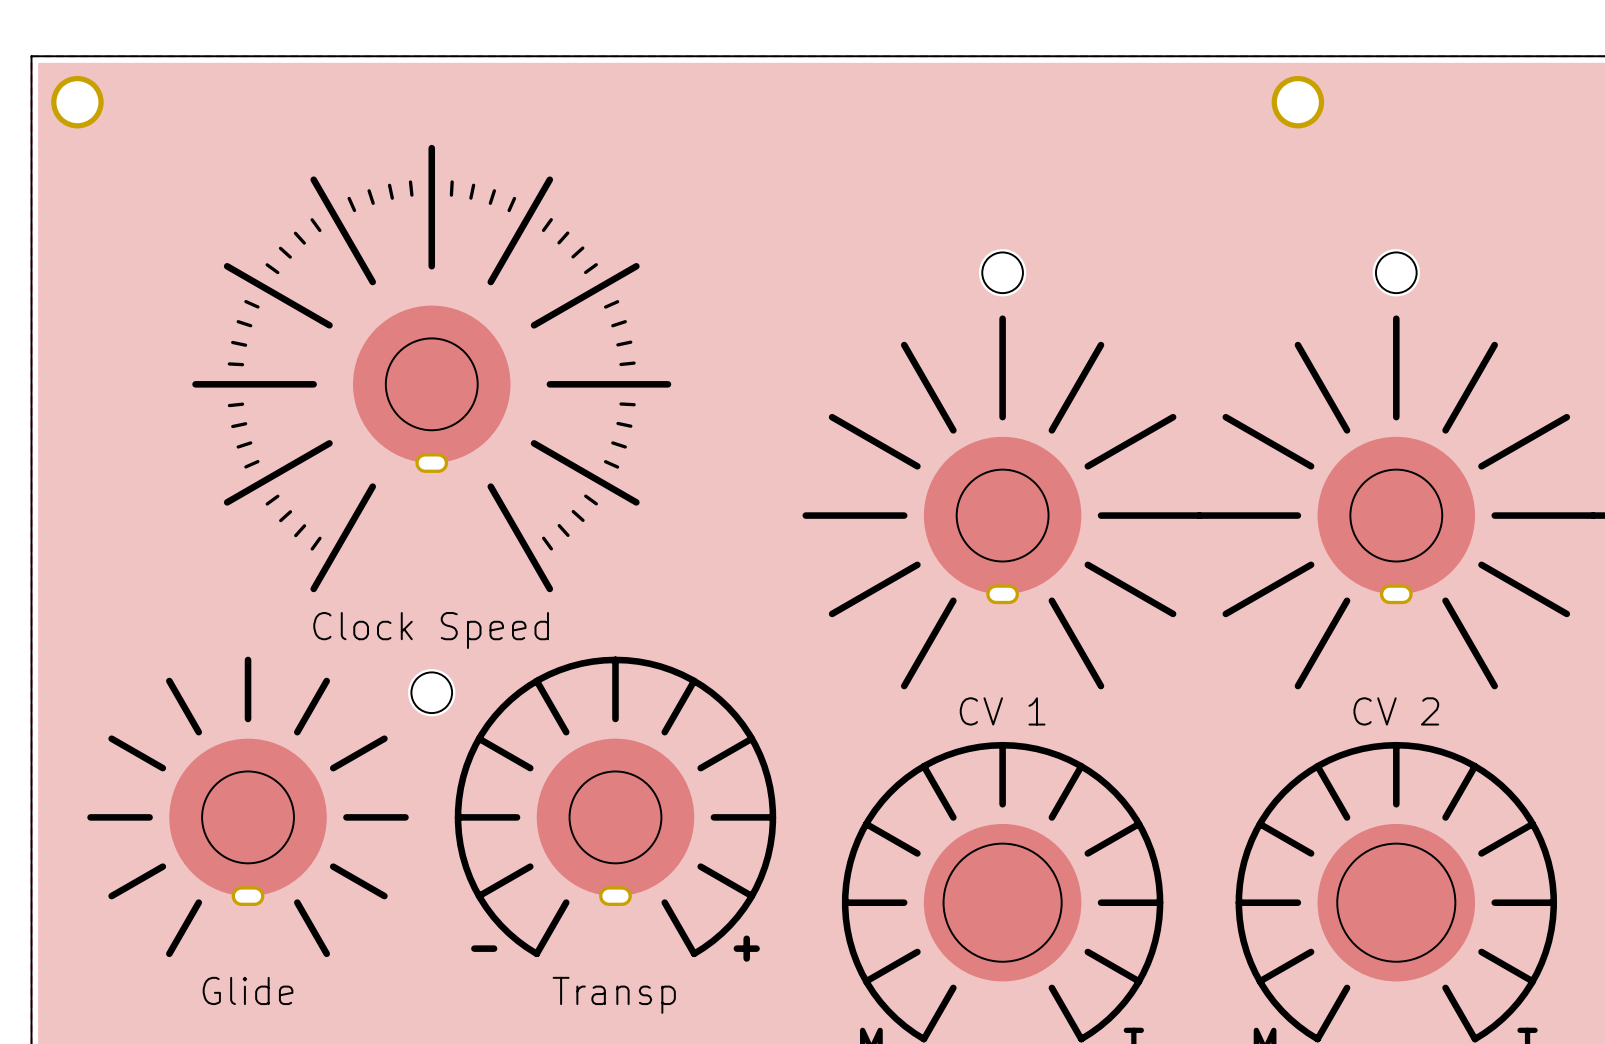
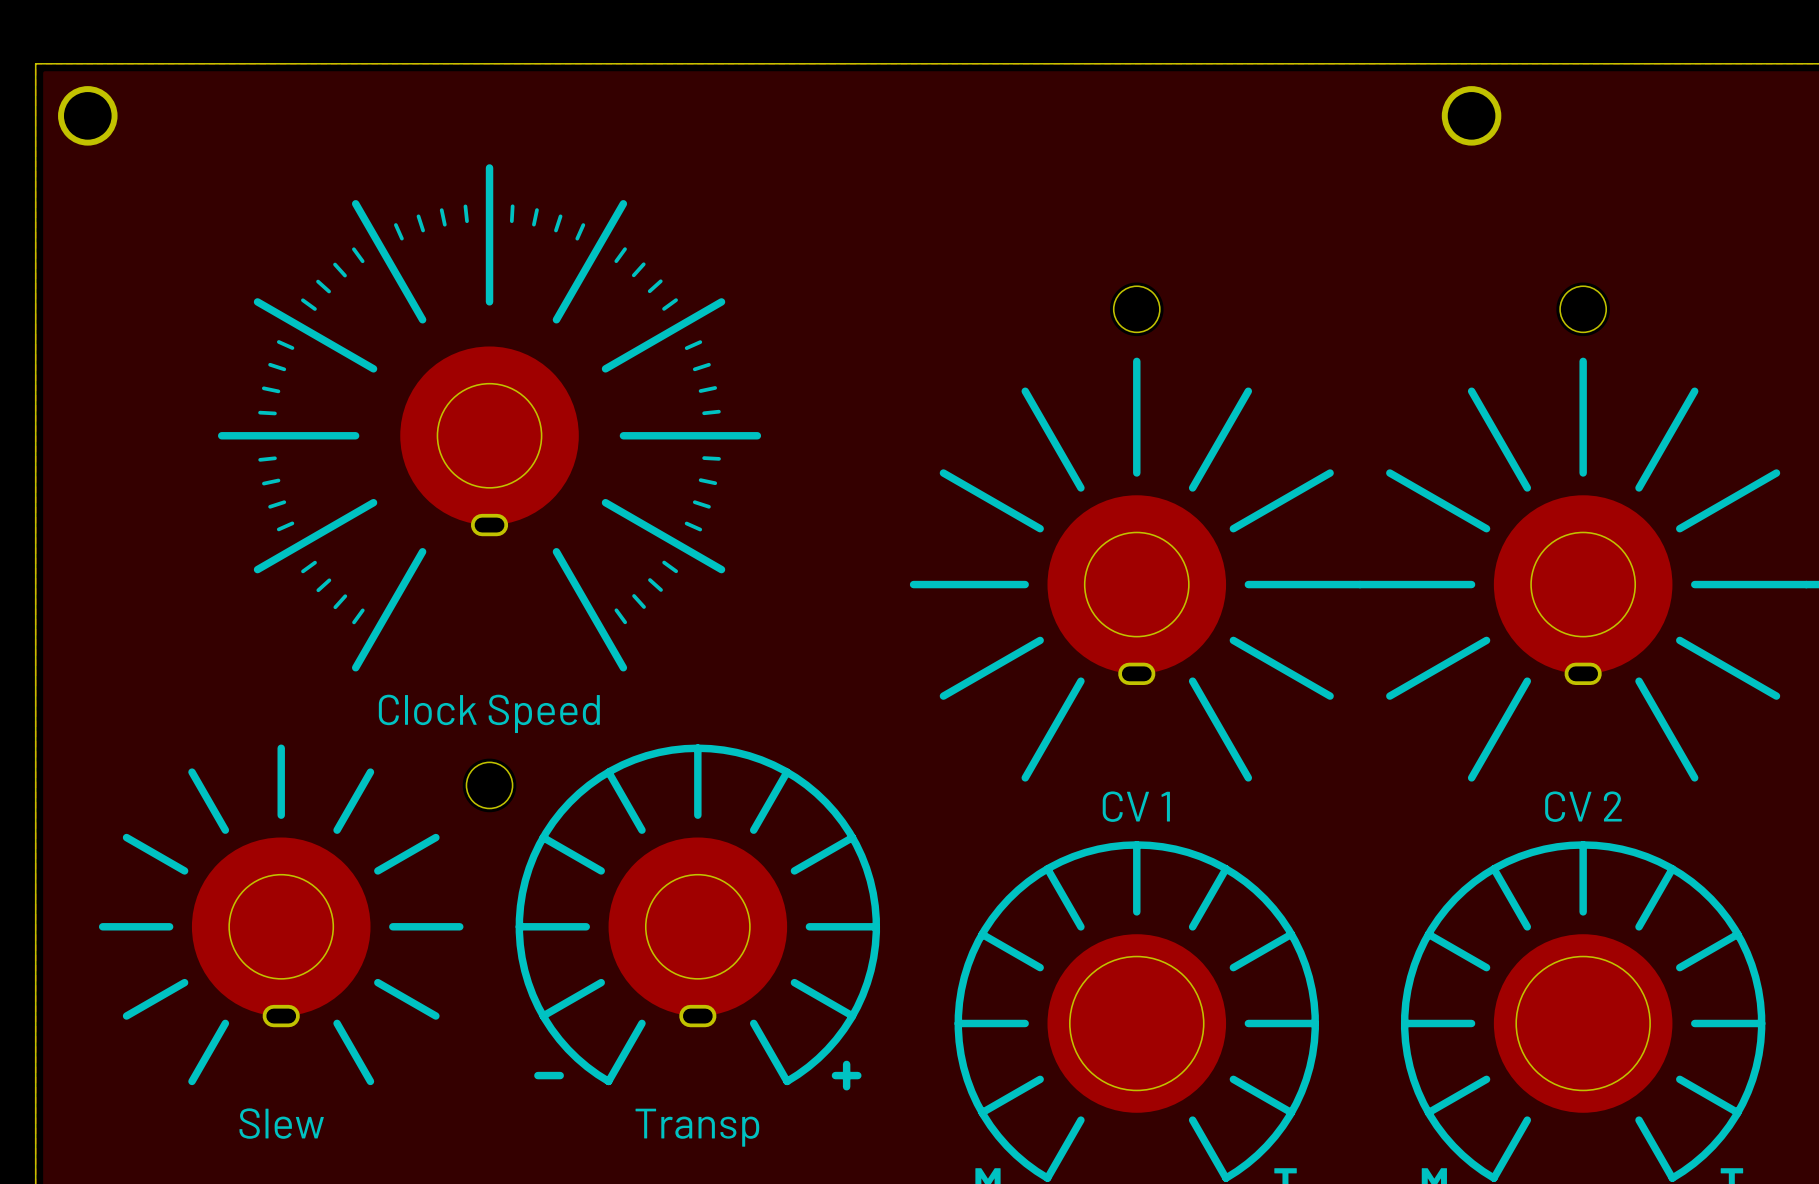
part value: Glide (248, 990) -> Slew (281, 1123)

